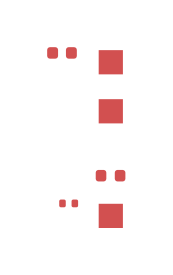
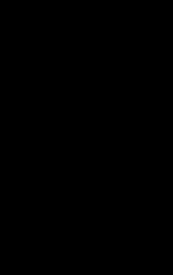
part: (62, 52) -> none
part: (110, 62) -> none
part: (110, 111) -> none
part: (110, 175) -> none
part: (68, 203) -> none
part: (110, 215) -> none

